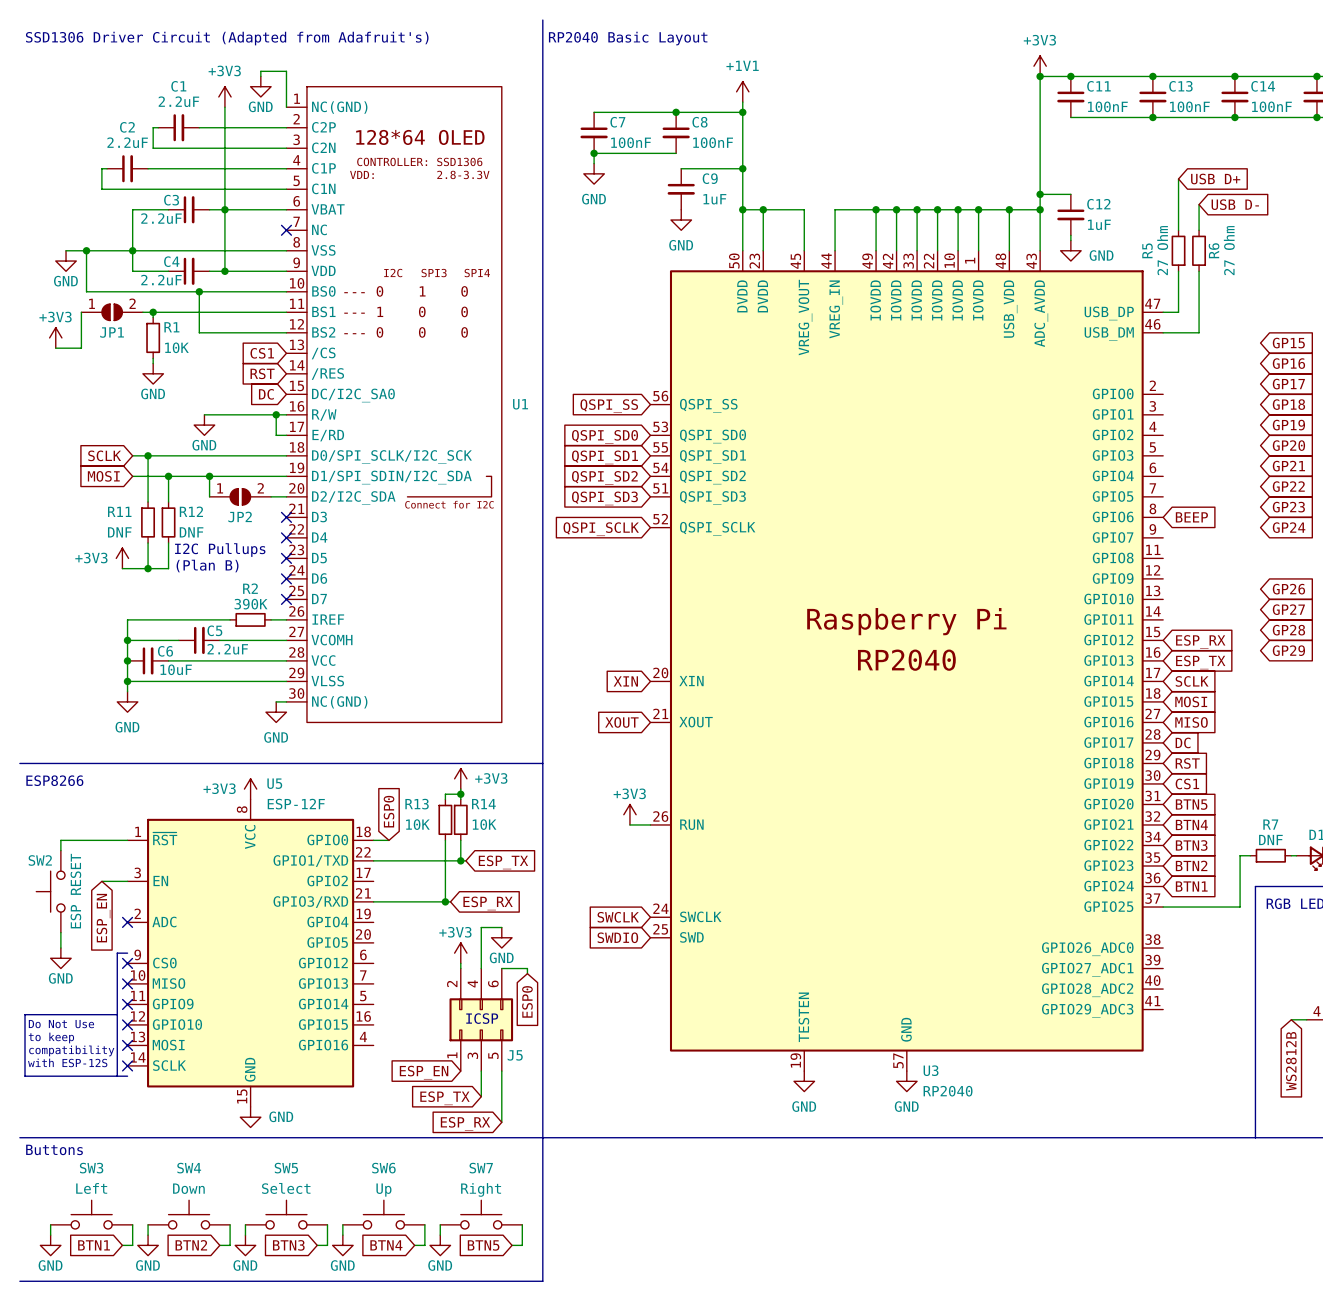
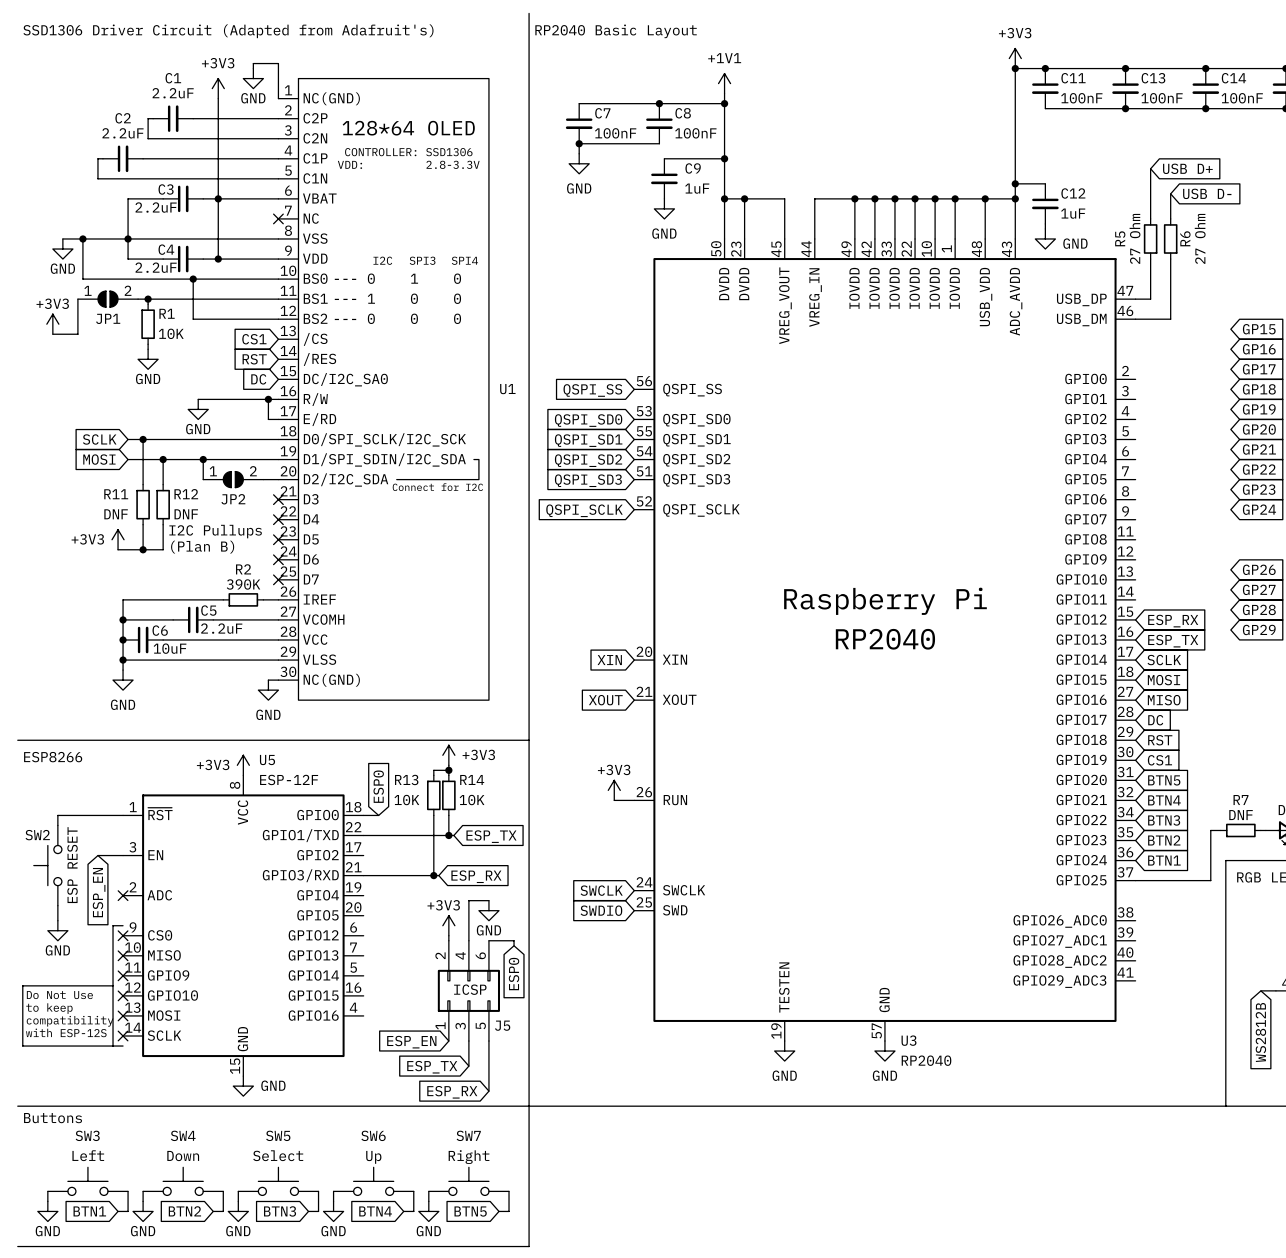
global label: BEEP (1191, 517) -> none

